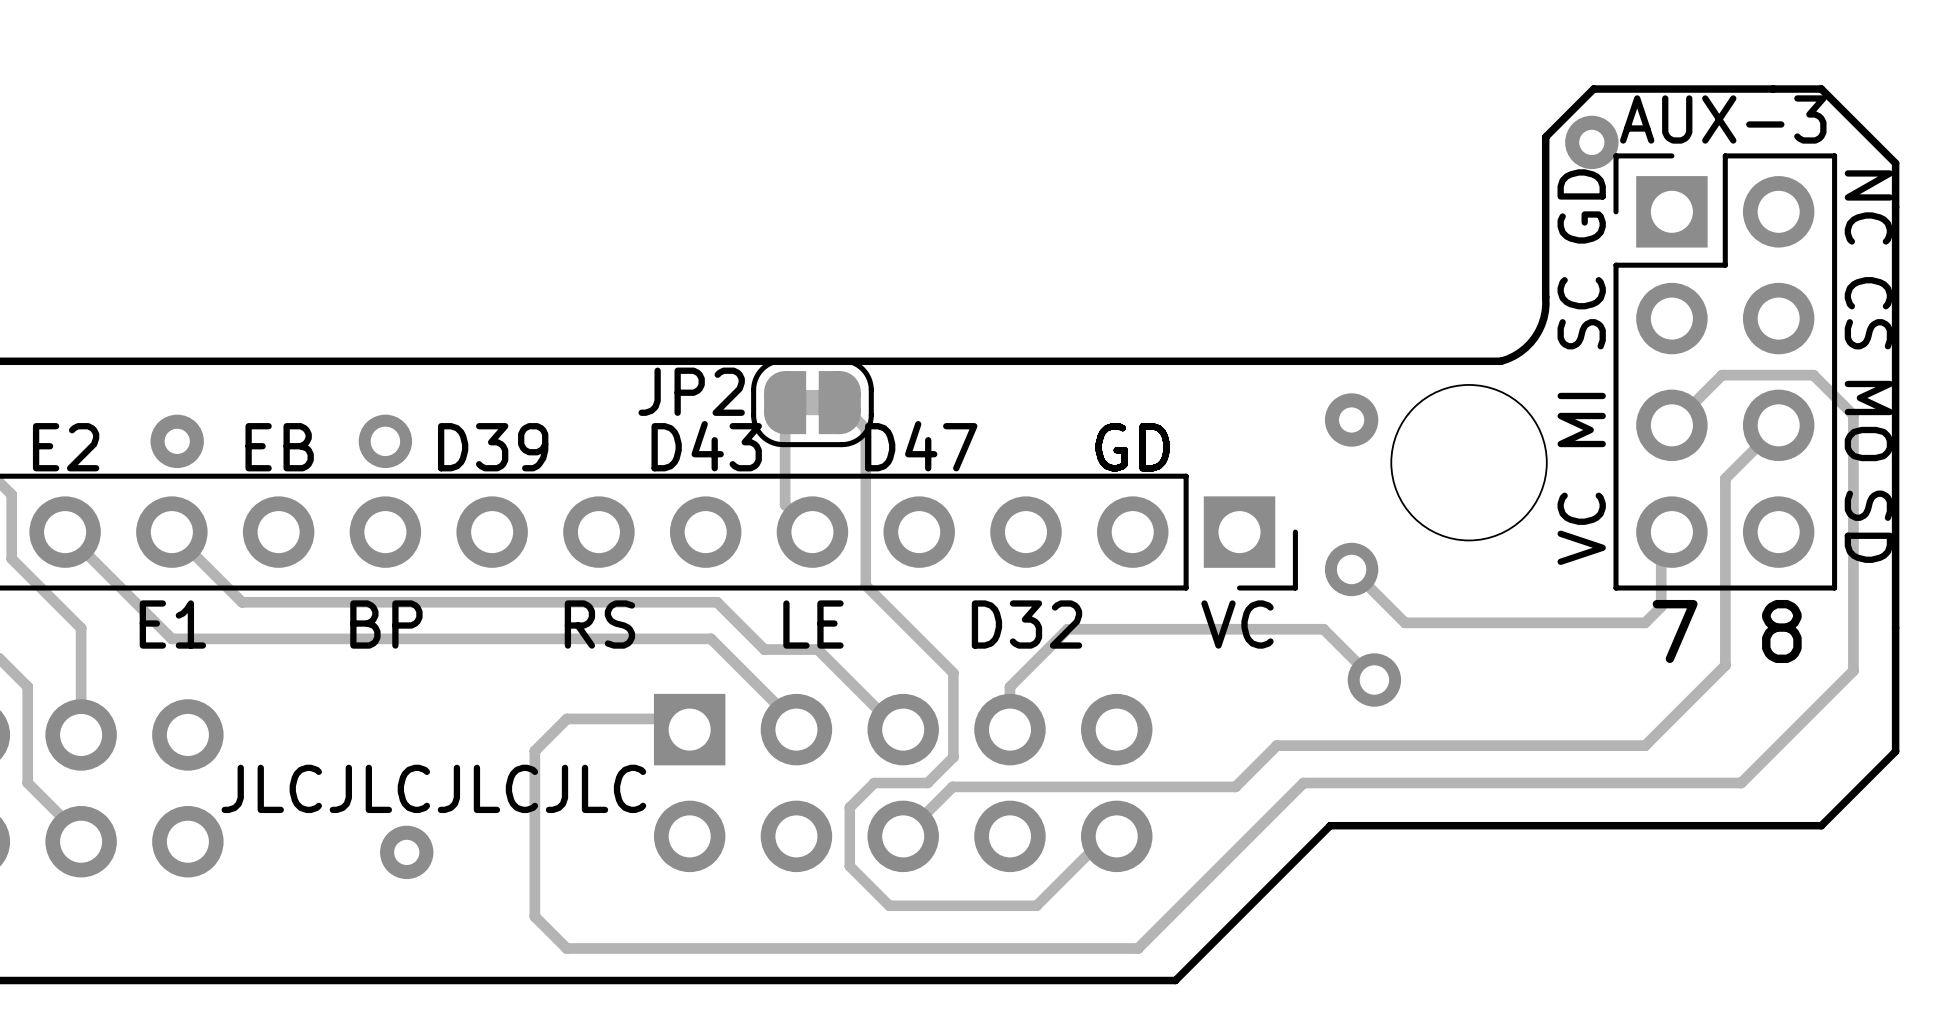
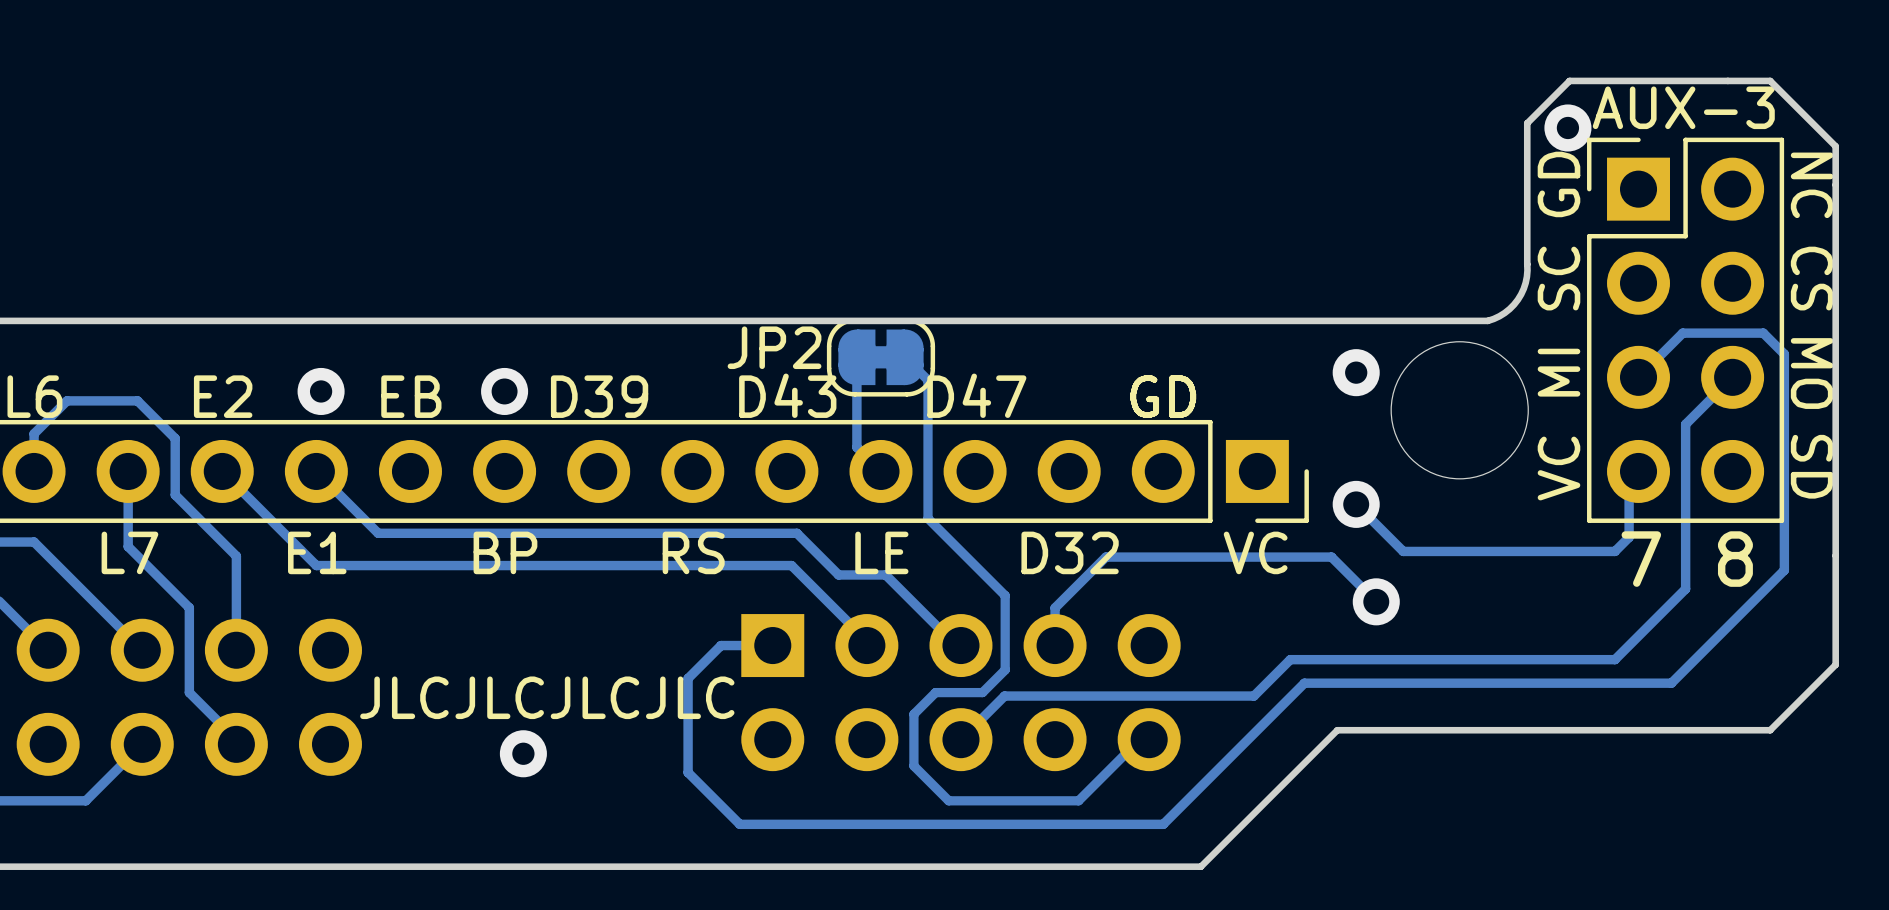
track: (1837, 399) (1853, 415) (1853, 670) (1741, 783) (1303, 783) (1138, 948) (566, 948) (534, 916) (534, 750) (566, 718) (679, 718) (689, 729) -> (1784, 354) (1784, 570) (1671, 683) (1304, 683) (1163, 824) (739, 824) (688, 772) (688, 678) (721, 645) (772, 645)

